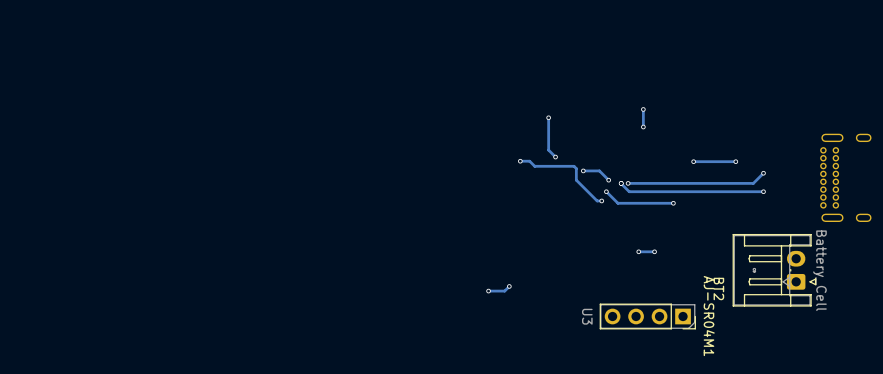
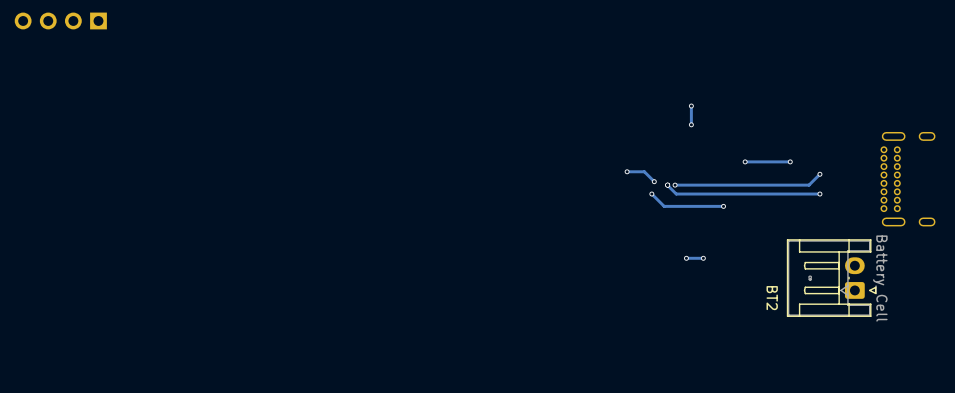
part: none -> (60, 20)
track: (548, 117) (548, 150) (555, 157) -> none
via: (548, 117) -> none
via: (555, 157) -> none
track: (520, 161) (529, 161) (534, 166) (574, 166) (576, 168) (576, 180) (597, 200) (601, 200) -> none
via: (520, 161) -> none
via: (601, 200) -> none
track: (509, 286) (504, 291) (488, 291) -> none
via: (509, 286) -> none
via: (488, 291) -> none
AJ-SR04M1: U3 (647, 316) -> none

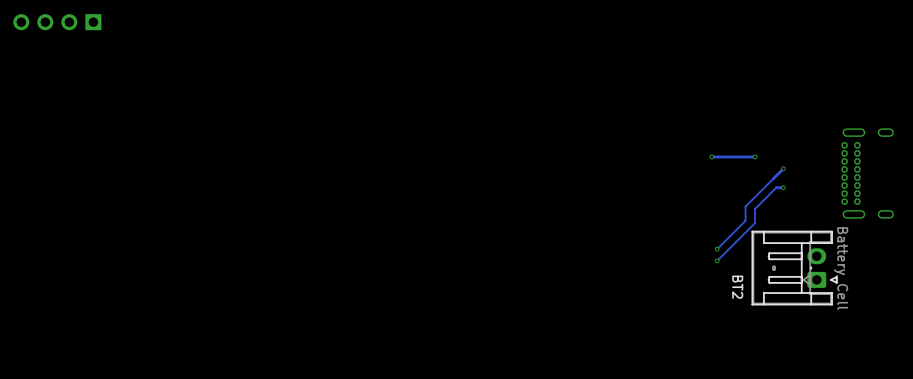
track: (691, 106) (691, 124) -> none
via: (691, 106) -> none
via: (691, 124) -> none
track: (627, 171) (644, 171) (654, 181) -> none
via: (627, 171) -> none
via: (654, 181) -> none
track: (667, 185) (676, 194) (812, 194) -> (717, 260) (755, 223) (755, 208) (776, 187)
via: (667, 185) -> none
via: (675, 185) -> none
track: (809, 185) (675, 185) -> (772, 179) (745, 206) (745, 220) (717, 249)
track: (651, 194) (664, 206) (723, 206) -> none
via: (651, 194) -> none
via: (723, 206) -> none
via: (686, 258) -> none
track: (703, 258) (686, 258) -> none
via: (703, 258) -> none
via: none -> (717, 249)
via: none -> (717, 260)

